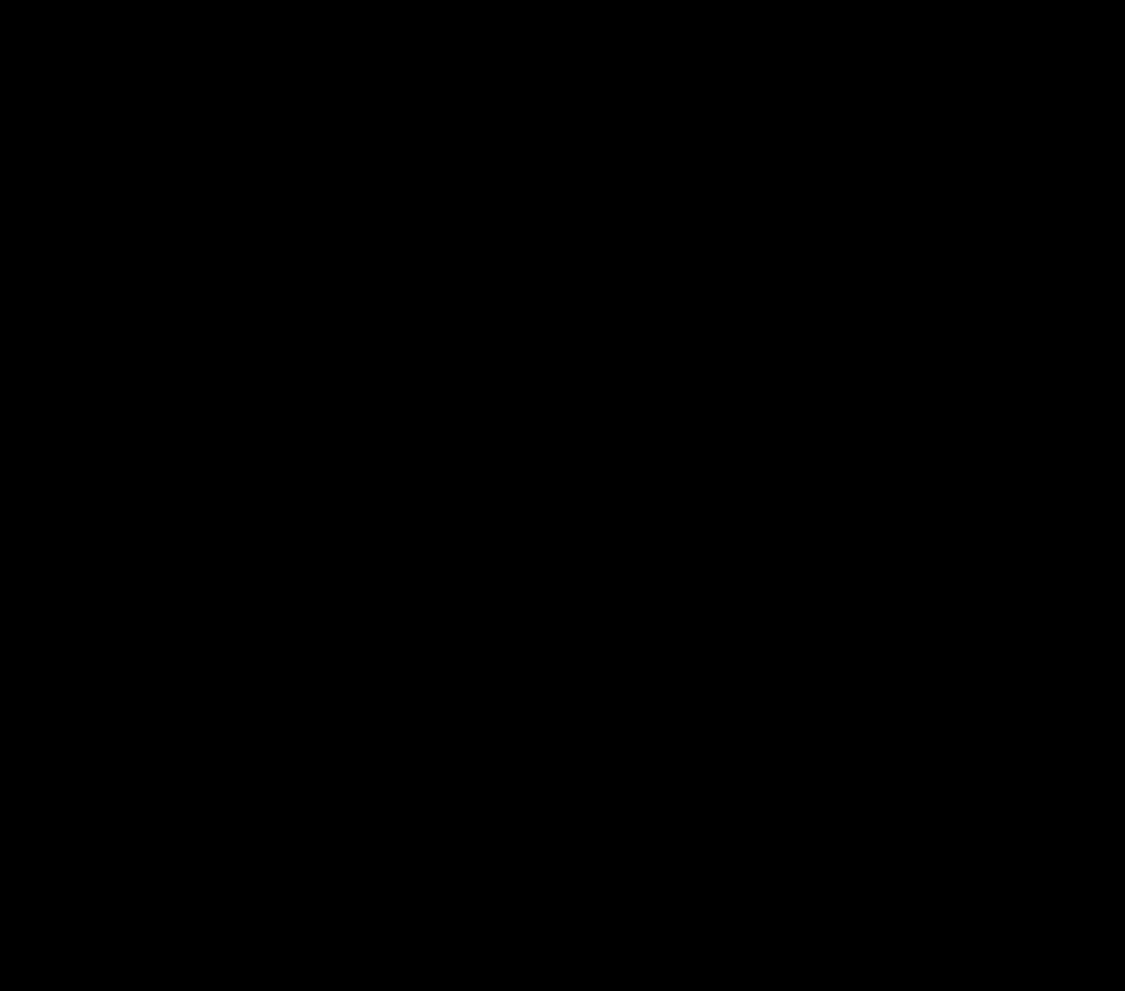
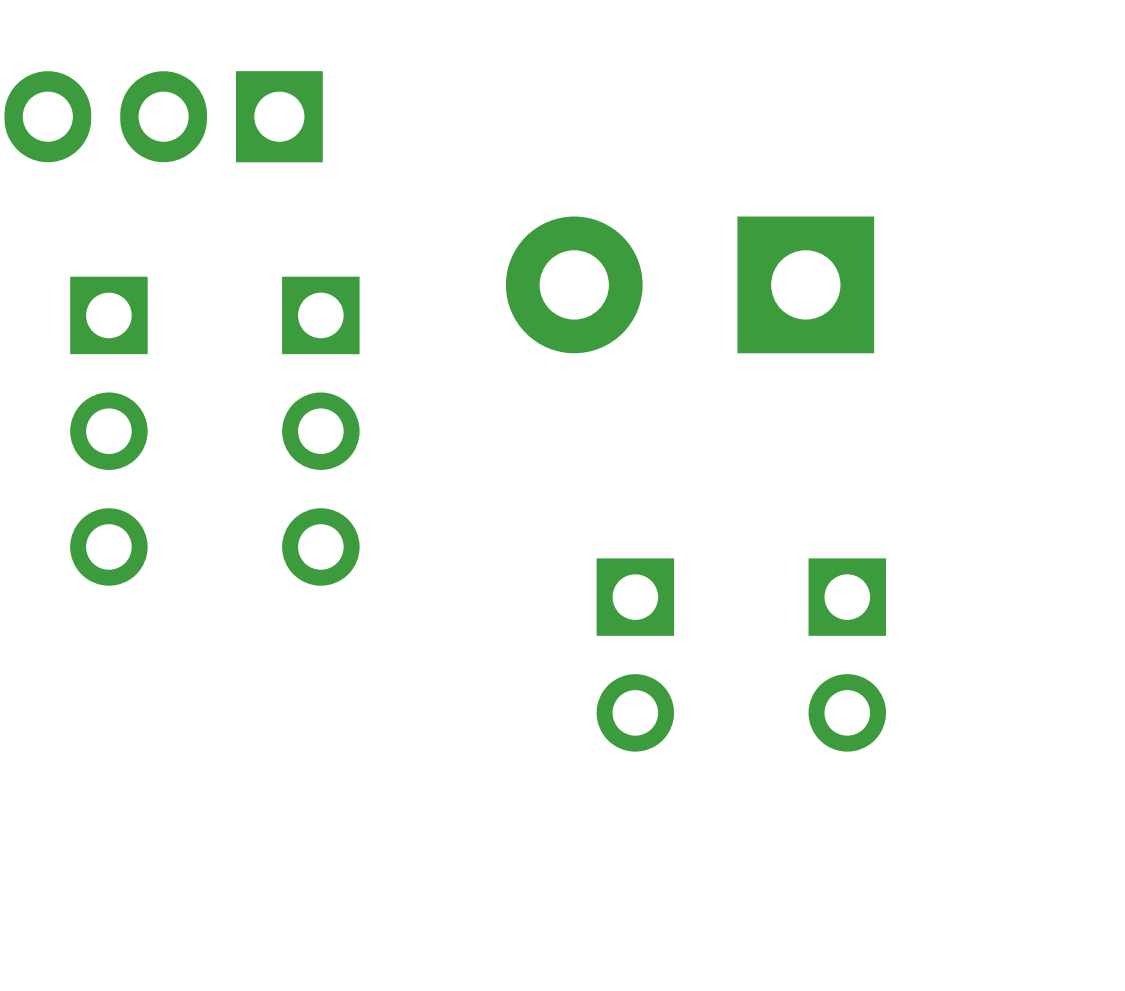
part: none -> (163, 116)
part: none -> (690, 284)
part: none -> (108, 431)
part: none -> (320, 431)
part: none -> (635, 654)
part: none -> (847, 654)

